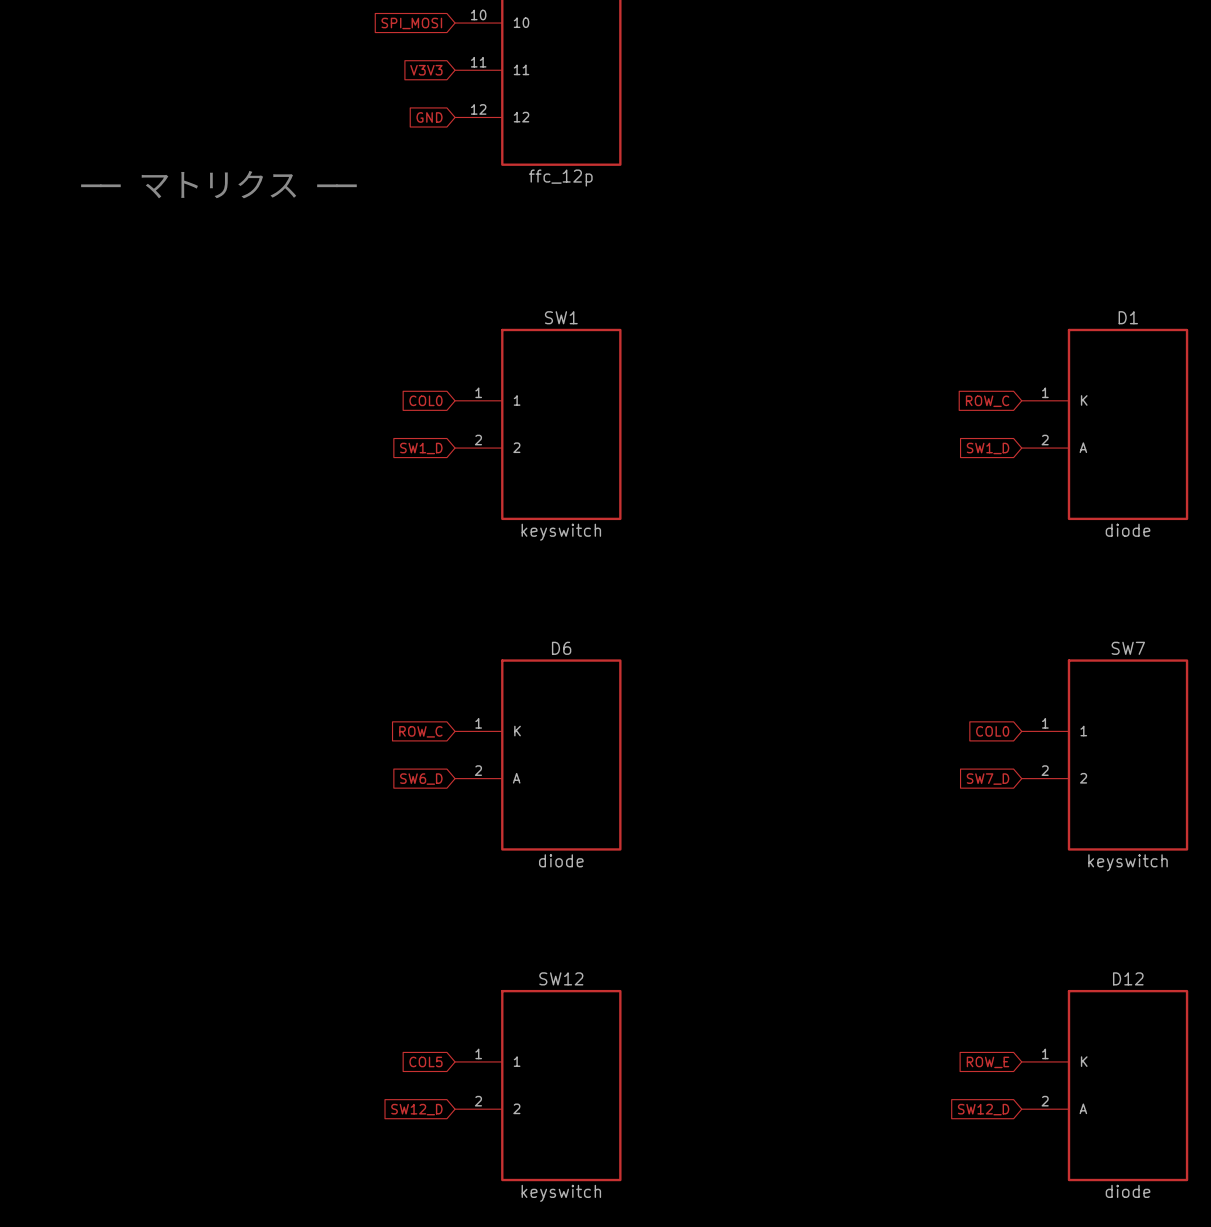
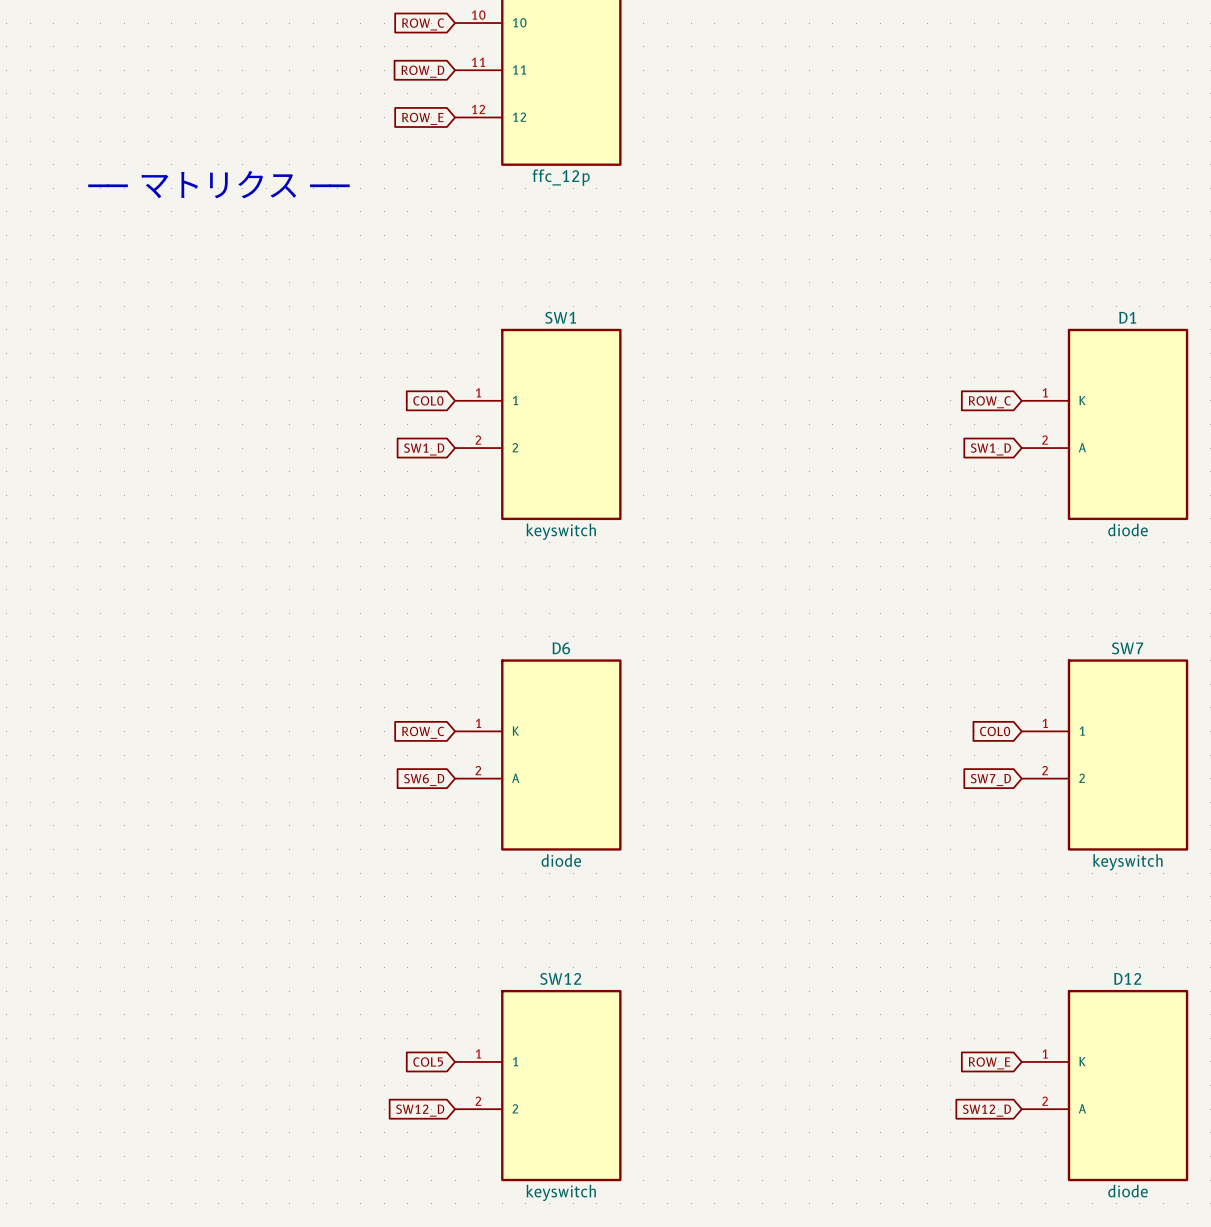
global label: SPI_MOSI (411, 23) -> ROW_C (423, 24)
global label: V3V3 (426, 70) -> ROW_D (422, 71)
global label: GND (429, 117) -> ROW_E (422, 118)

